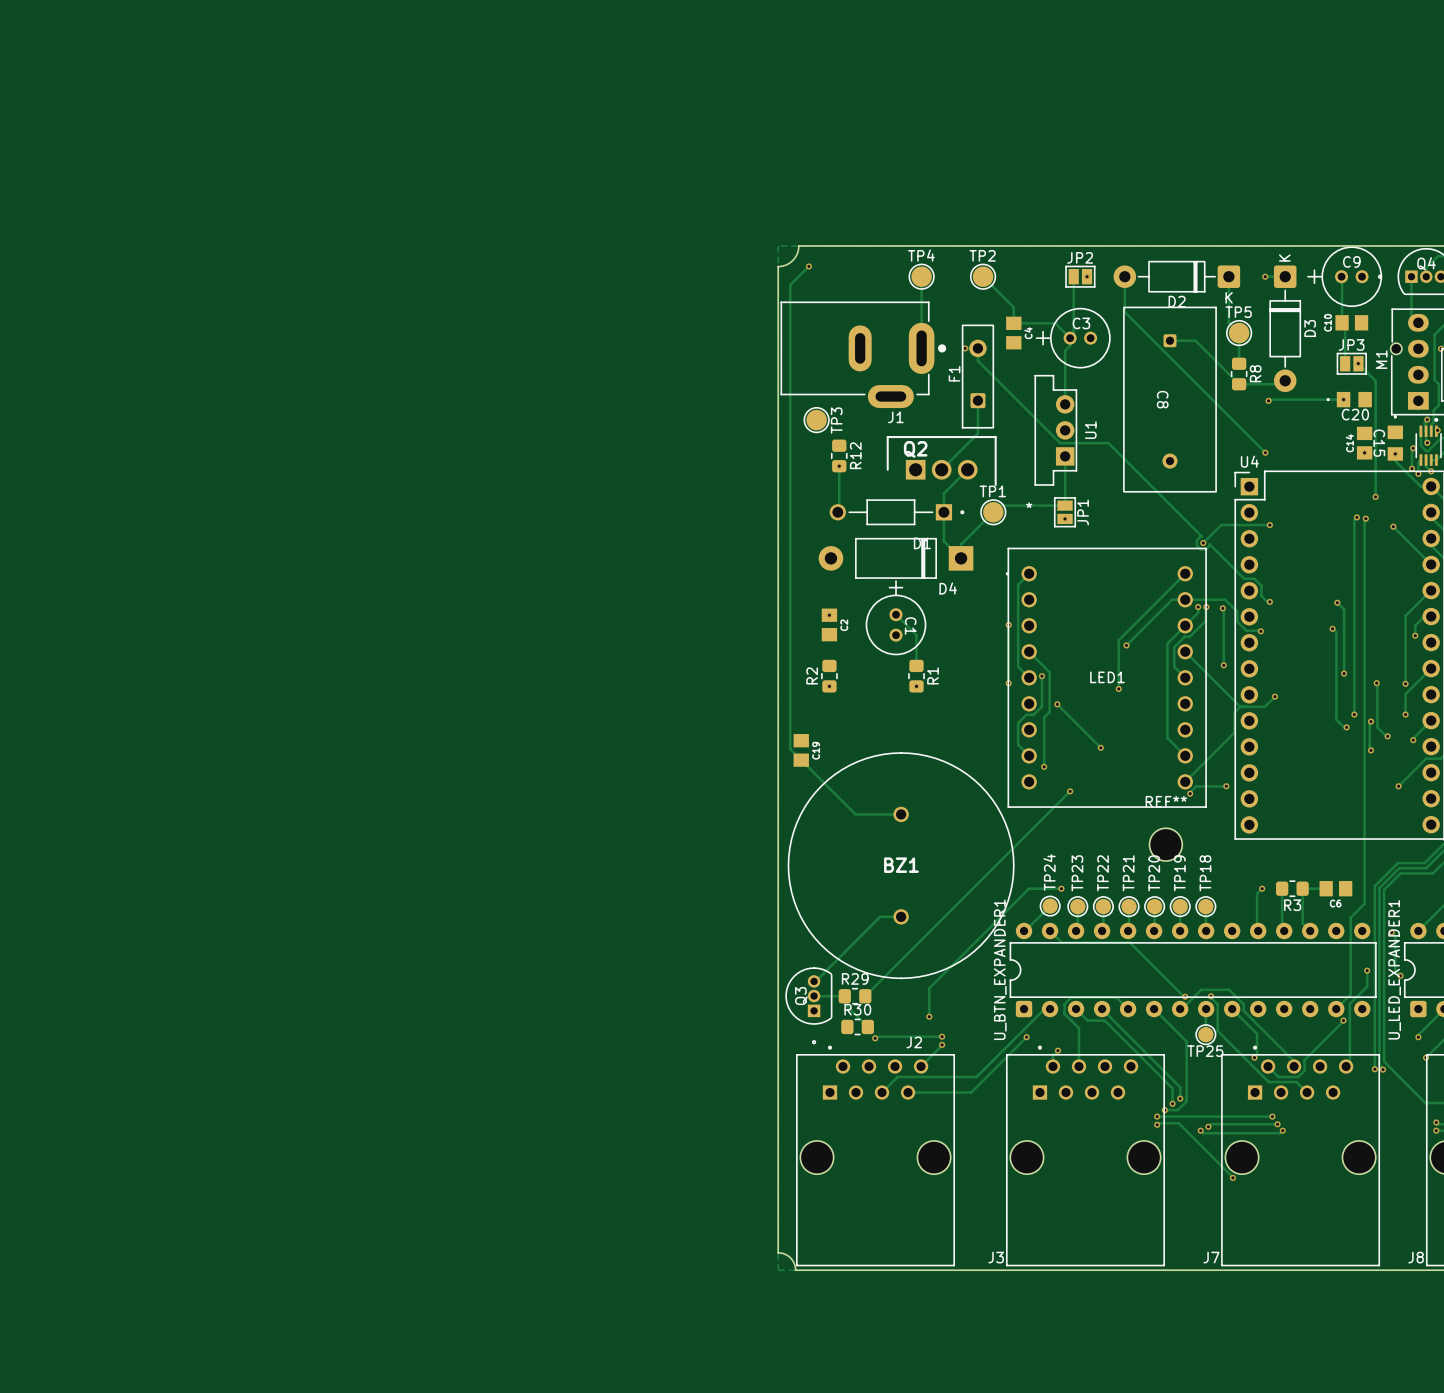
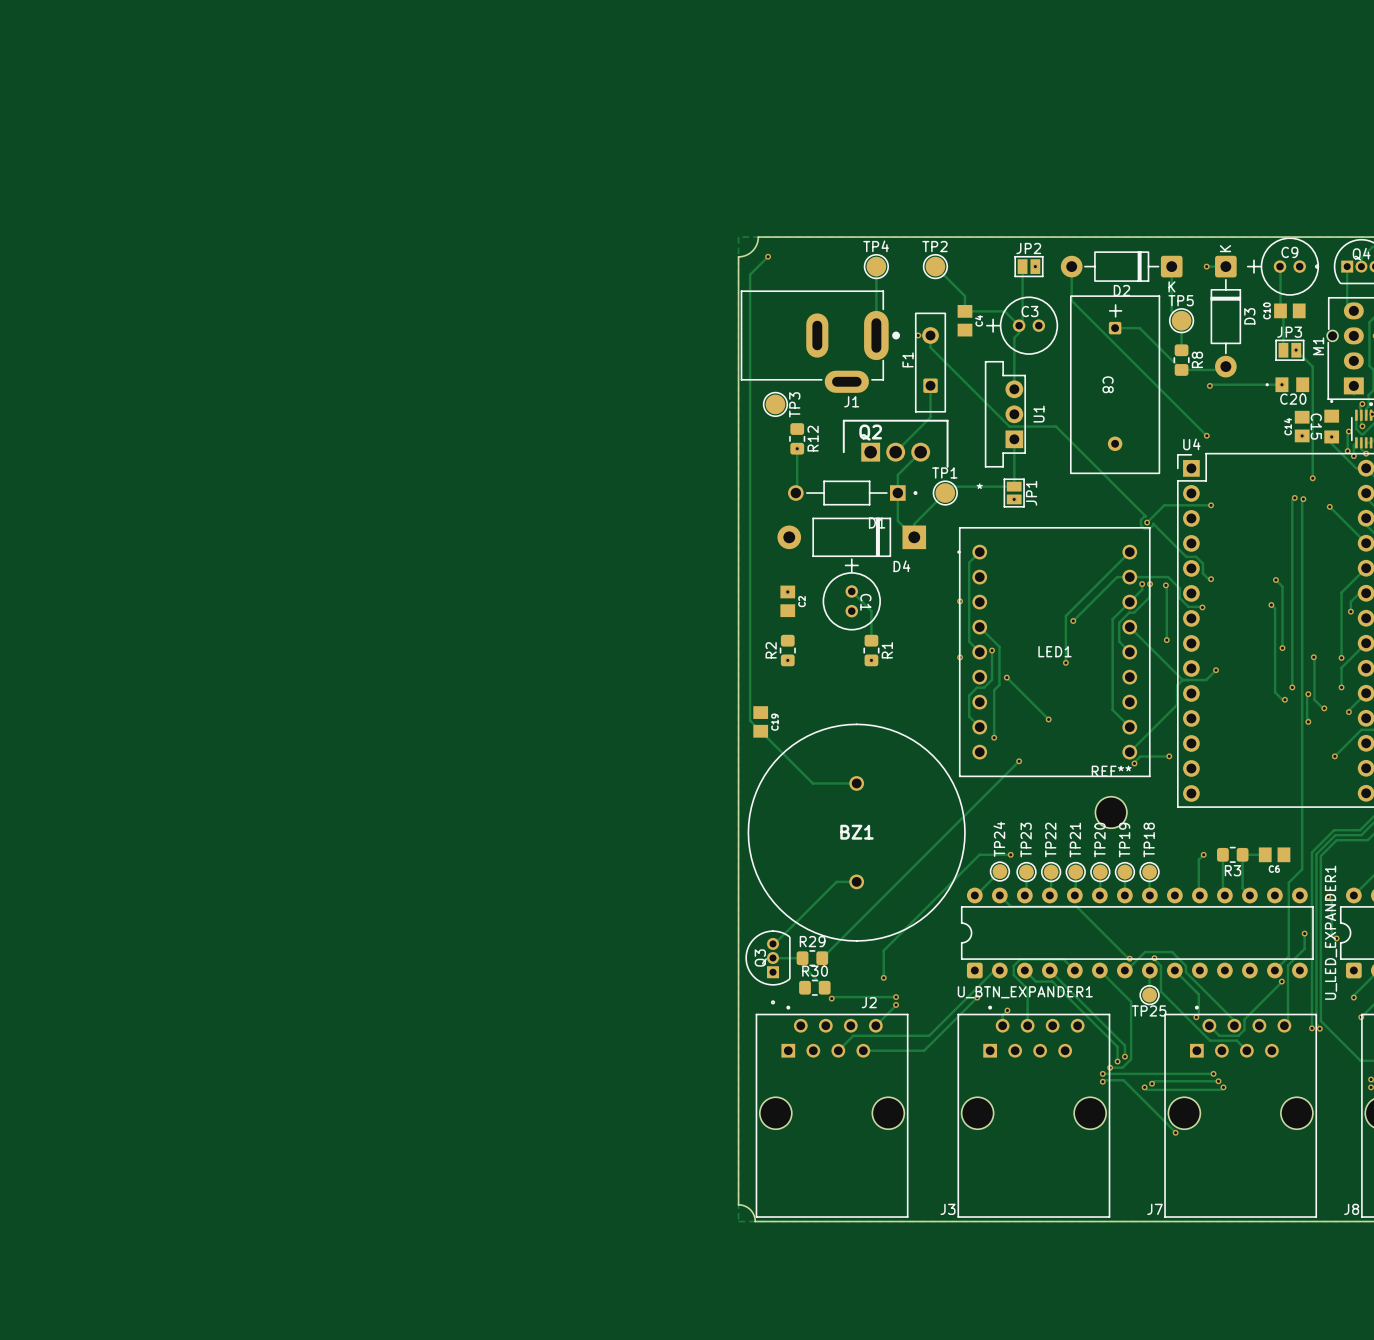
C8 footprint: [1123, 306, 1217, 493] -> [1070, 295, 1160, 474]
U_BTN_EXPANDER1 name rotation: 0° (1000, 969) -> 90° clockwise (1025, 992)

